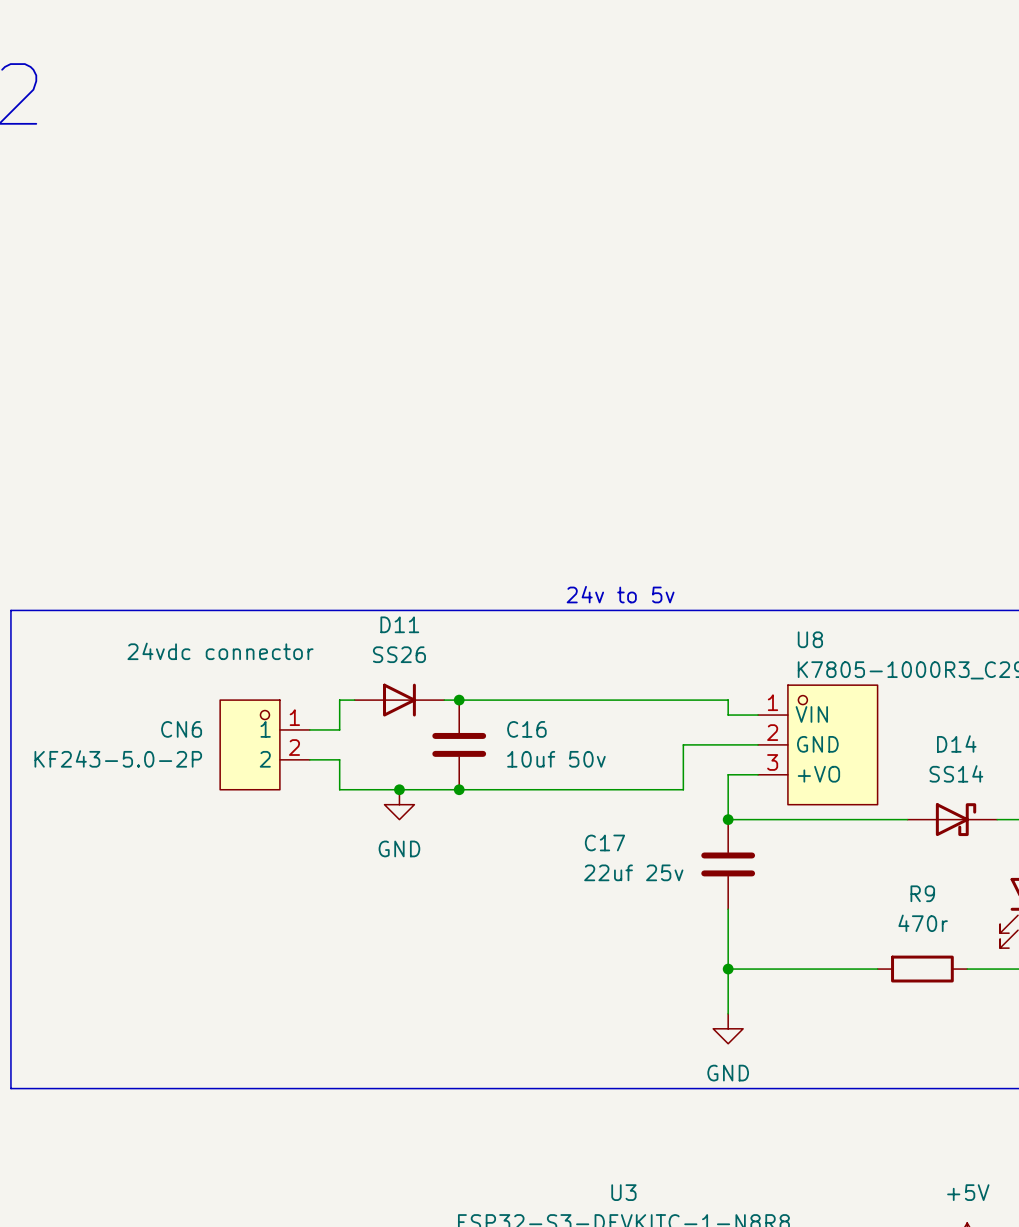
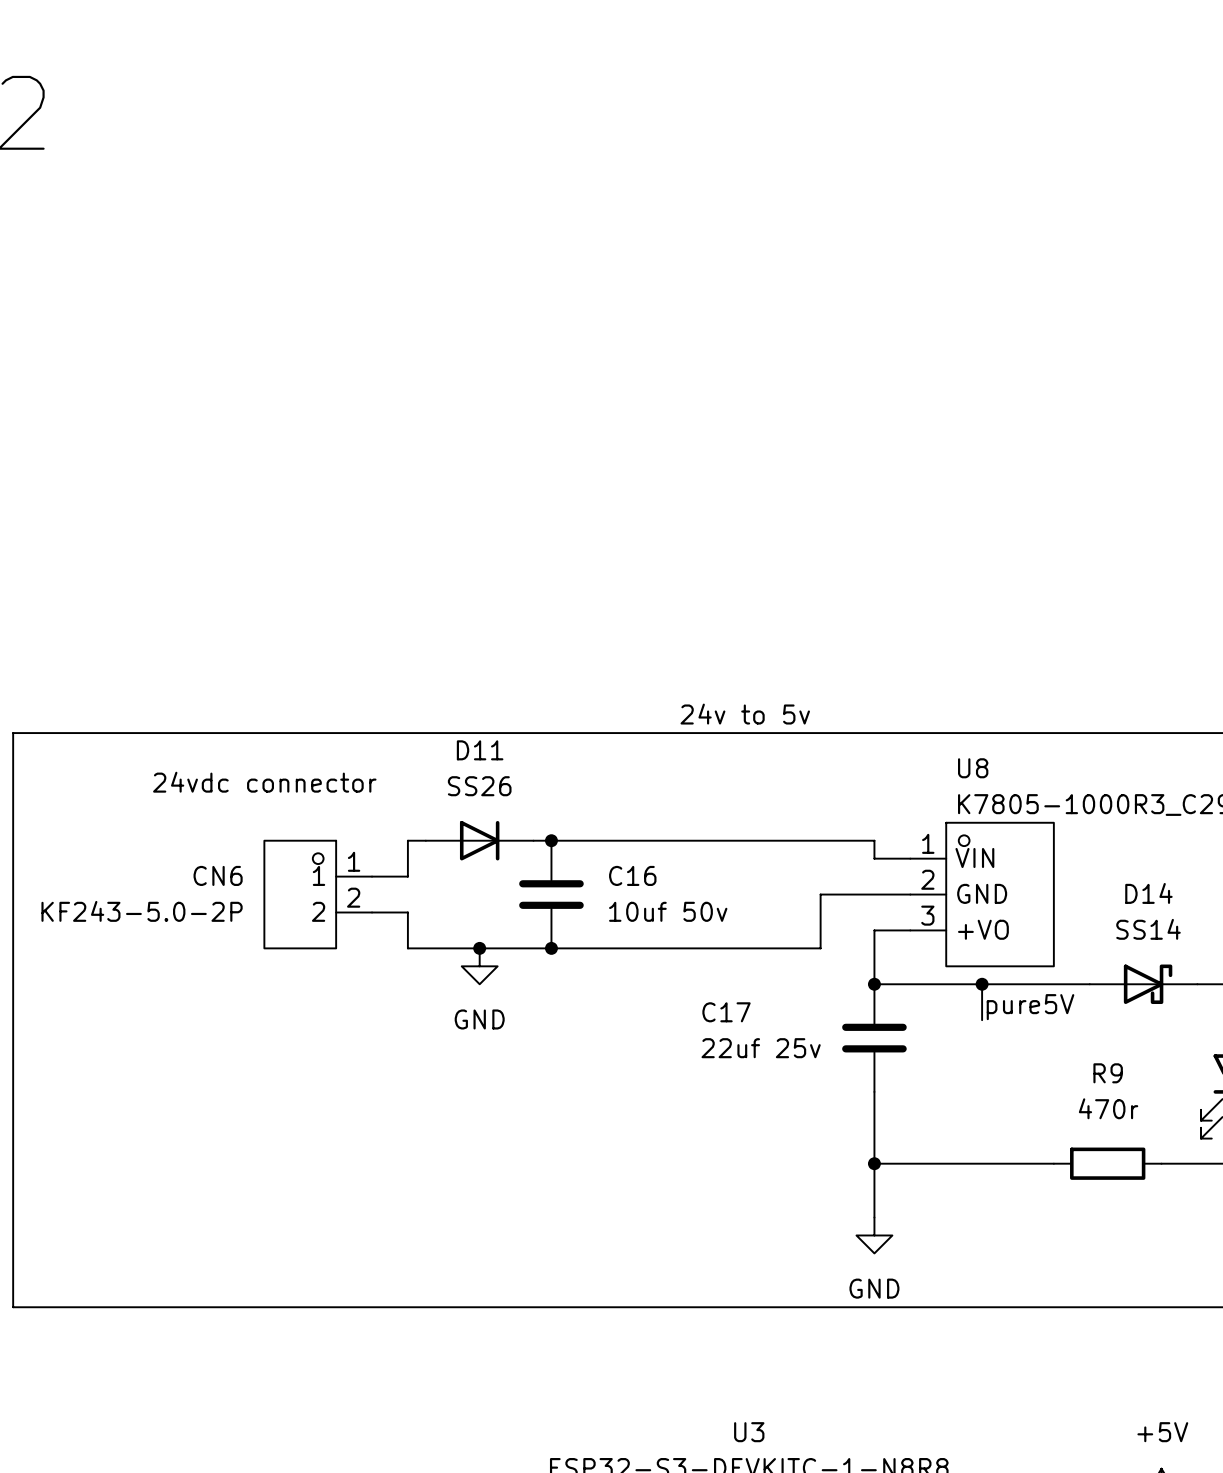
wire: none -> (982, 984) (982, 1020)
junction: none -> (982, 984)
label: none -> pure5V (1030, 1007)

